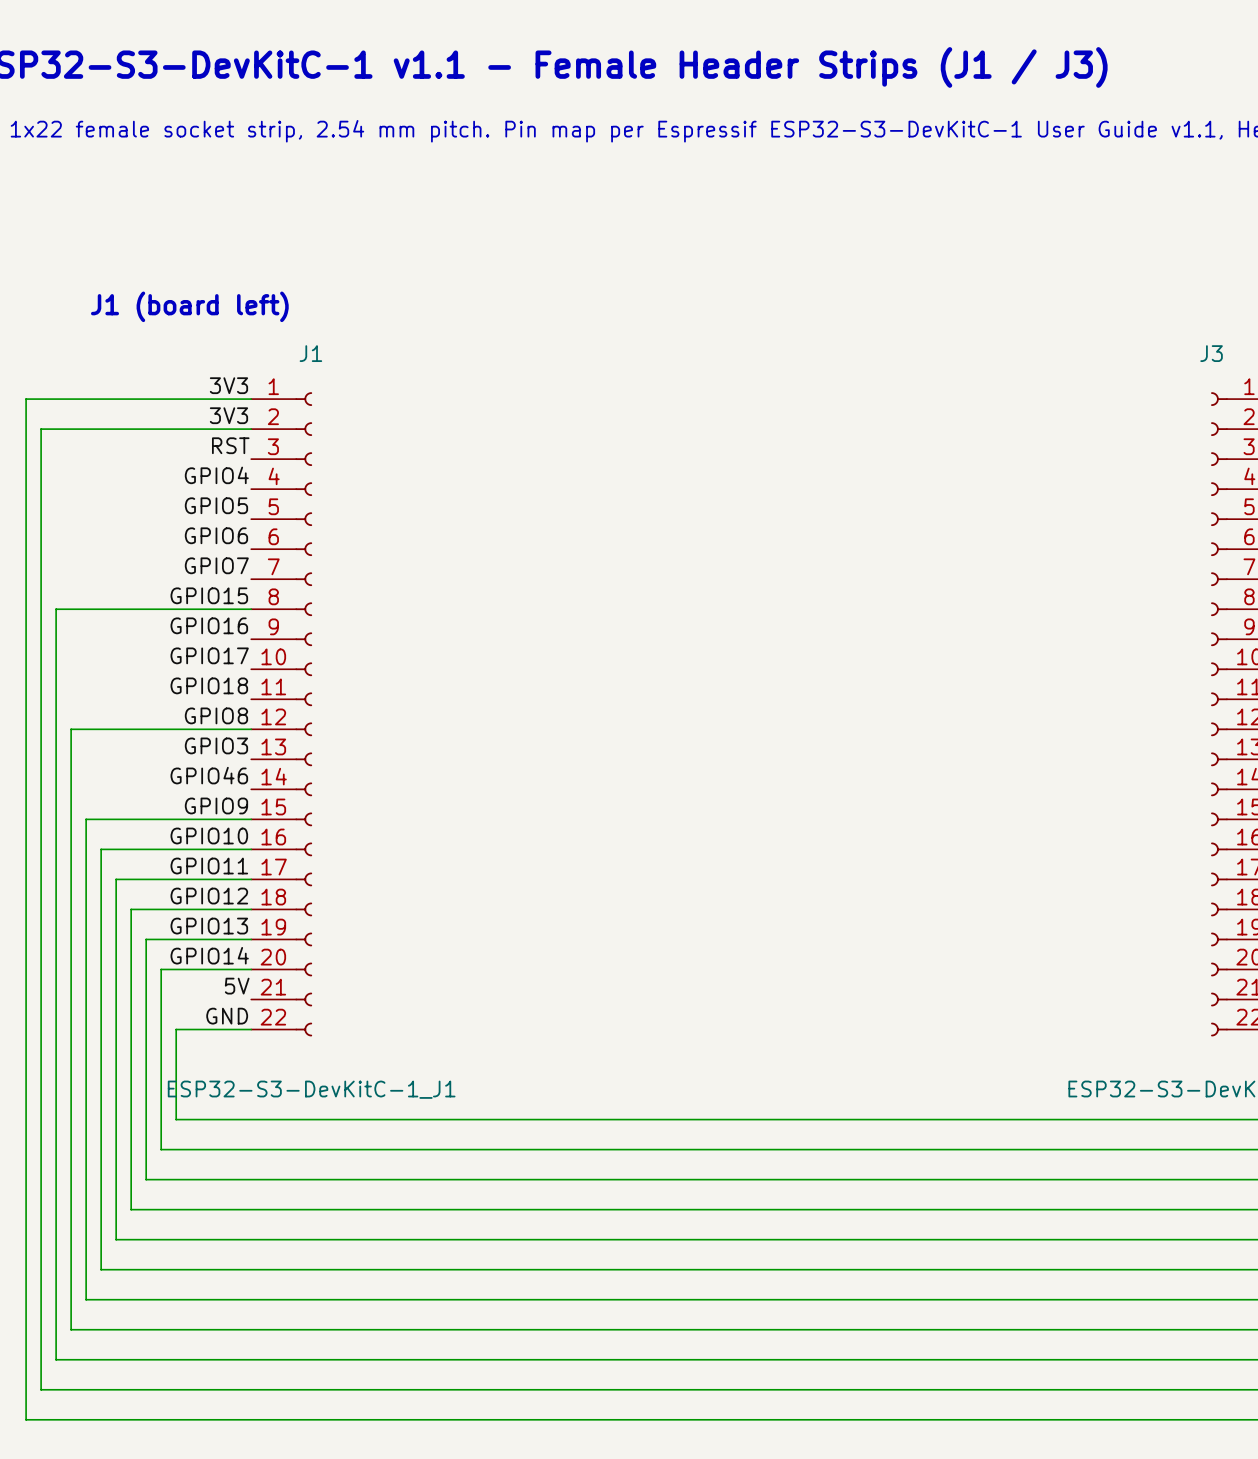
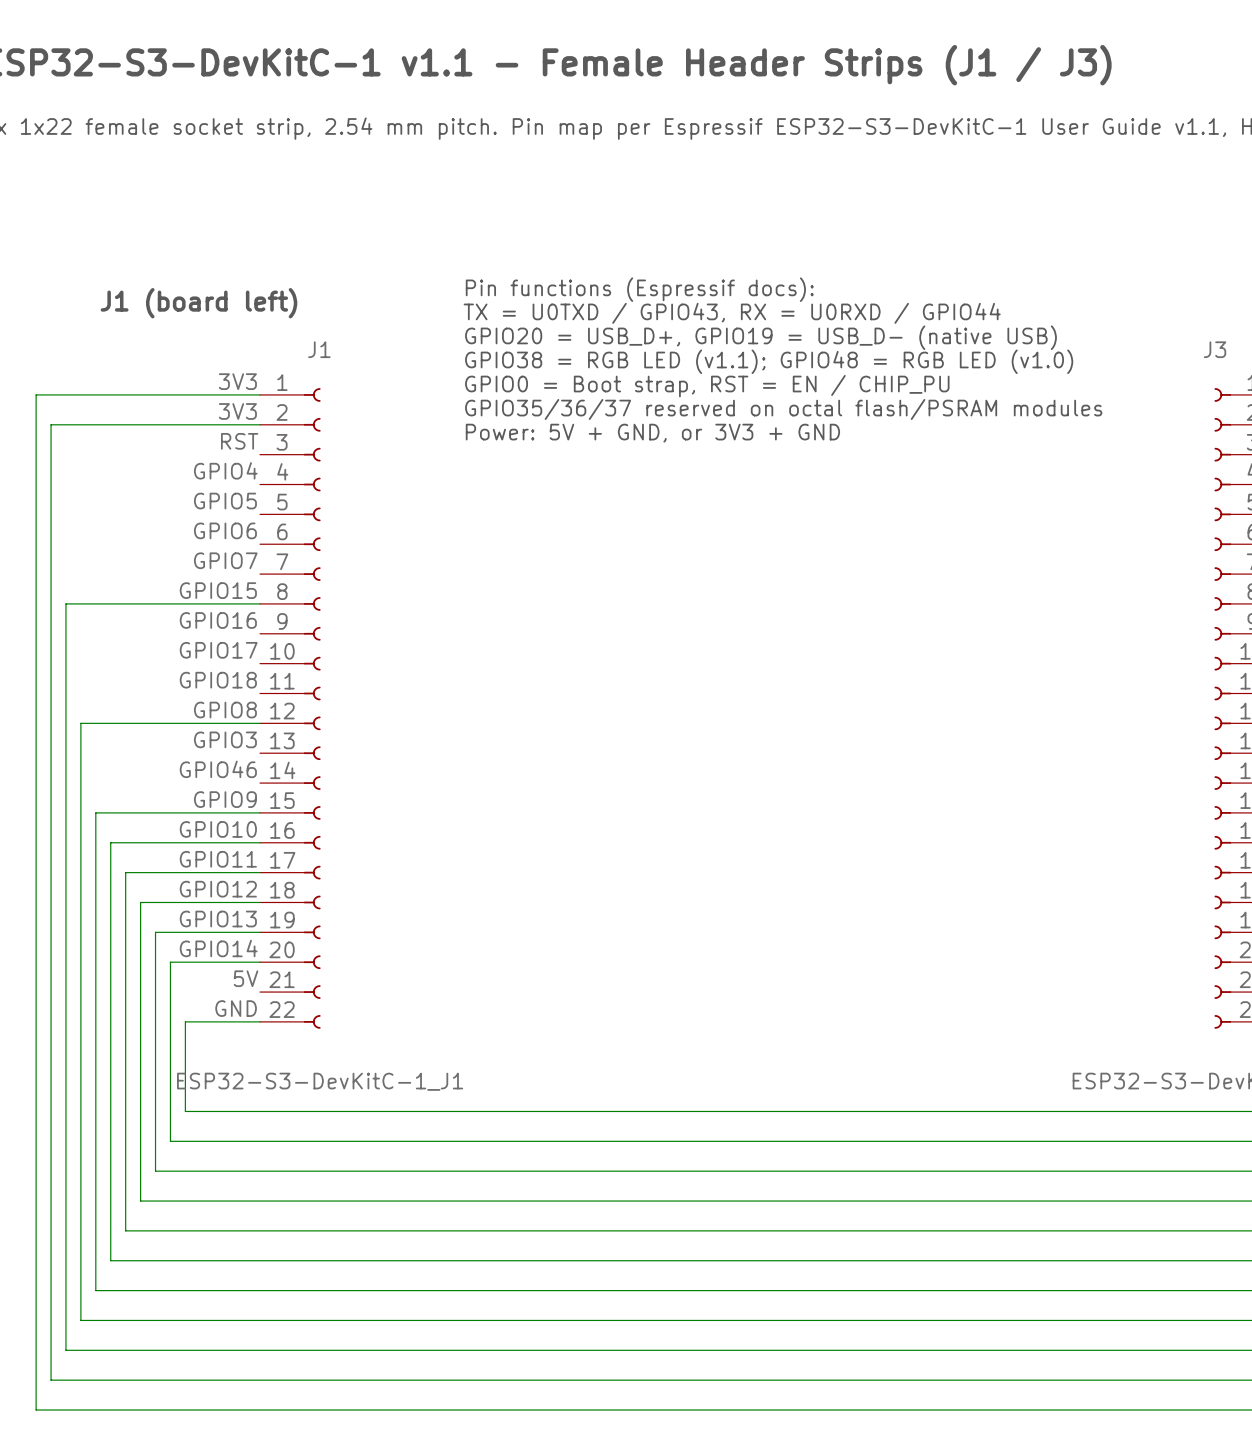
text: none -> Pin functions (Espressif docs): (639, 289)
text: none -> TX = U0TXD / GPIO43, RX = U0RXD / GPIO44 (732, 313)
text: none -> GPIO20 = USB_D+, GPIO19 = USB_D- (native USB) (760, 337)
text: none -> GPIO38 = RGB LED (v1.1); GPIO48 = RGB LED (v1.0) (769, 361)
text: none -> GPIO0 = Boot strap, RST = EN / CHIP_PU (707, 386)
text: none -> GPIO35/36/37 reserved on octal flash/PSRAM modules (783, 409)
text: none -> Power: 5V + GND, or 3V3 + GND (652, 433)

